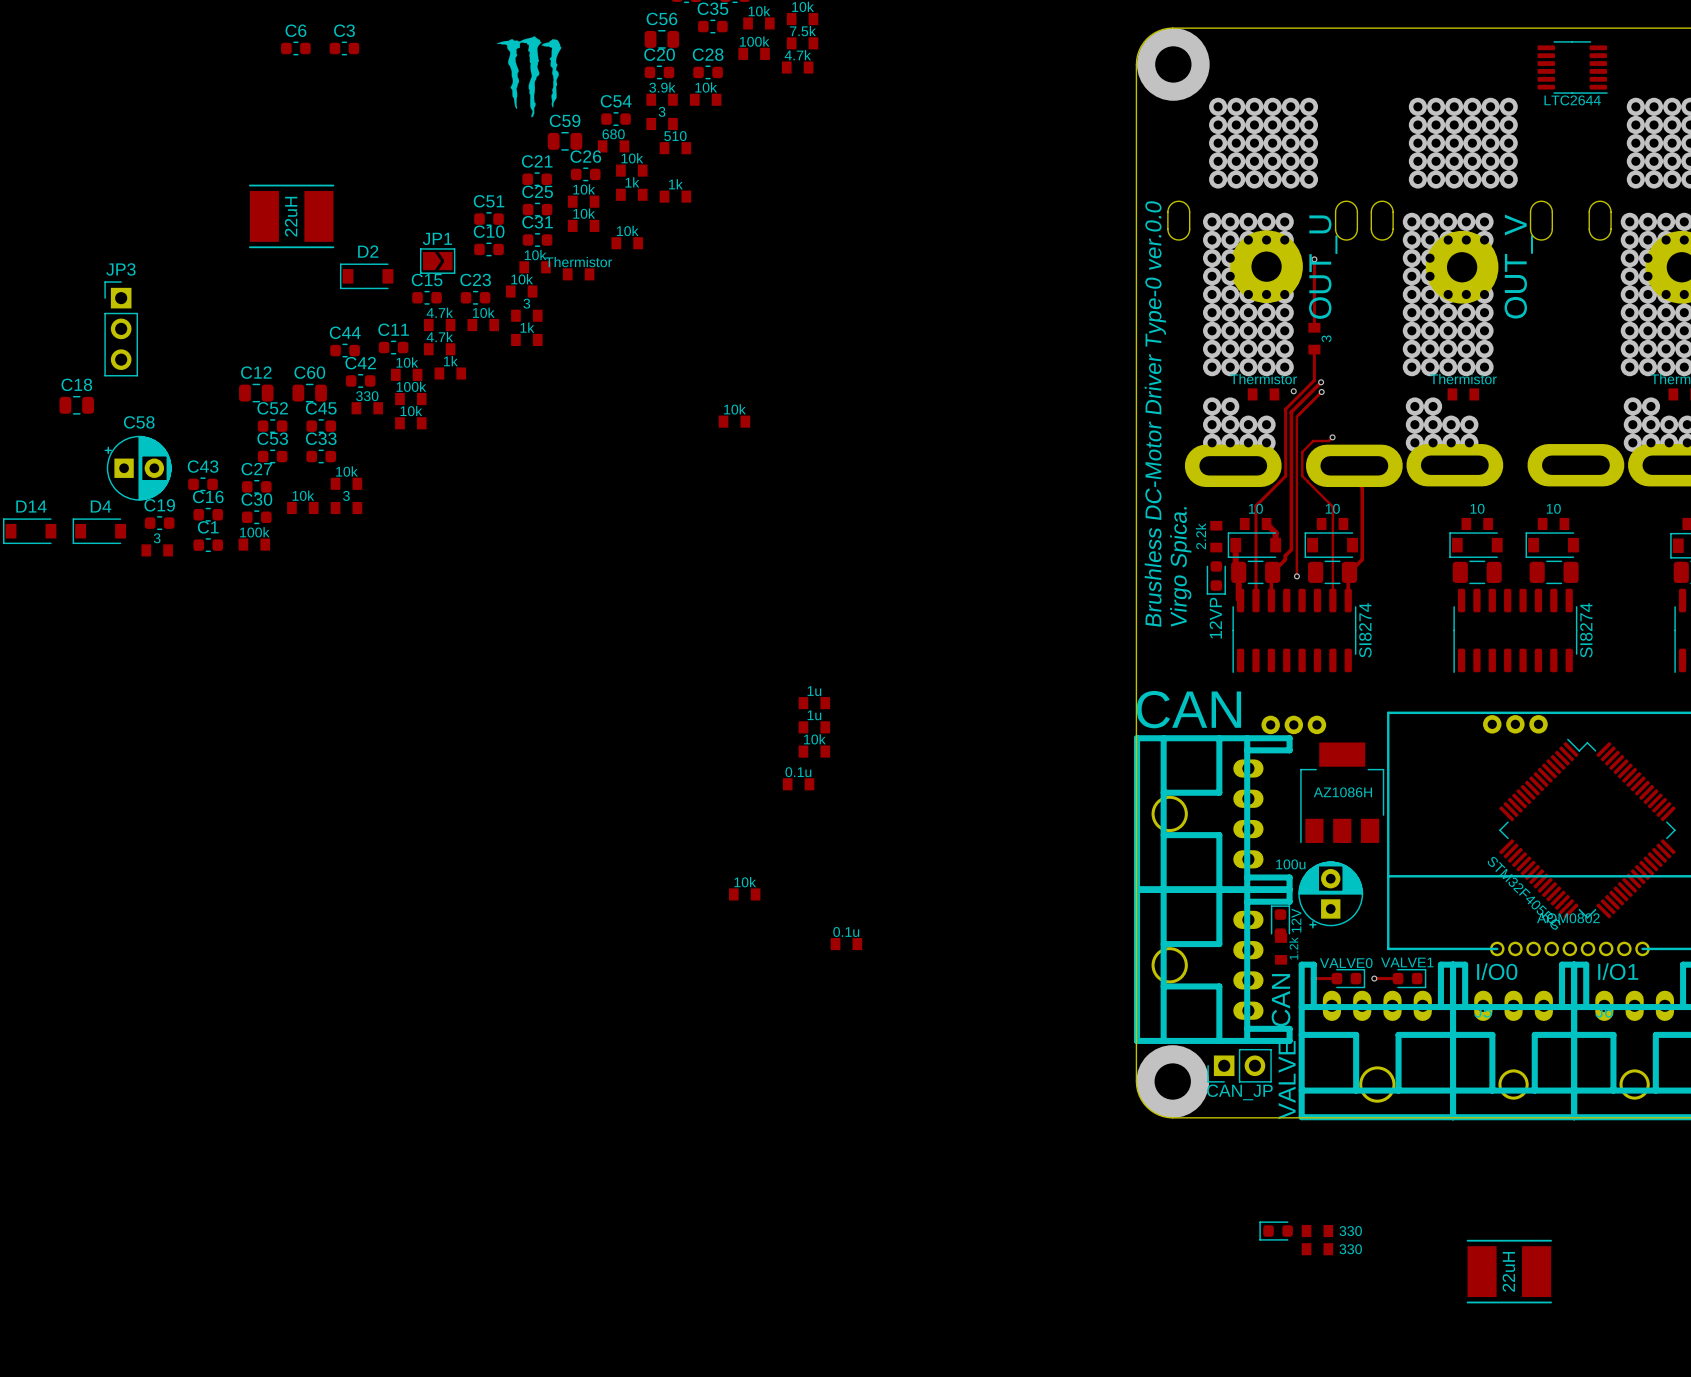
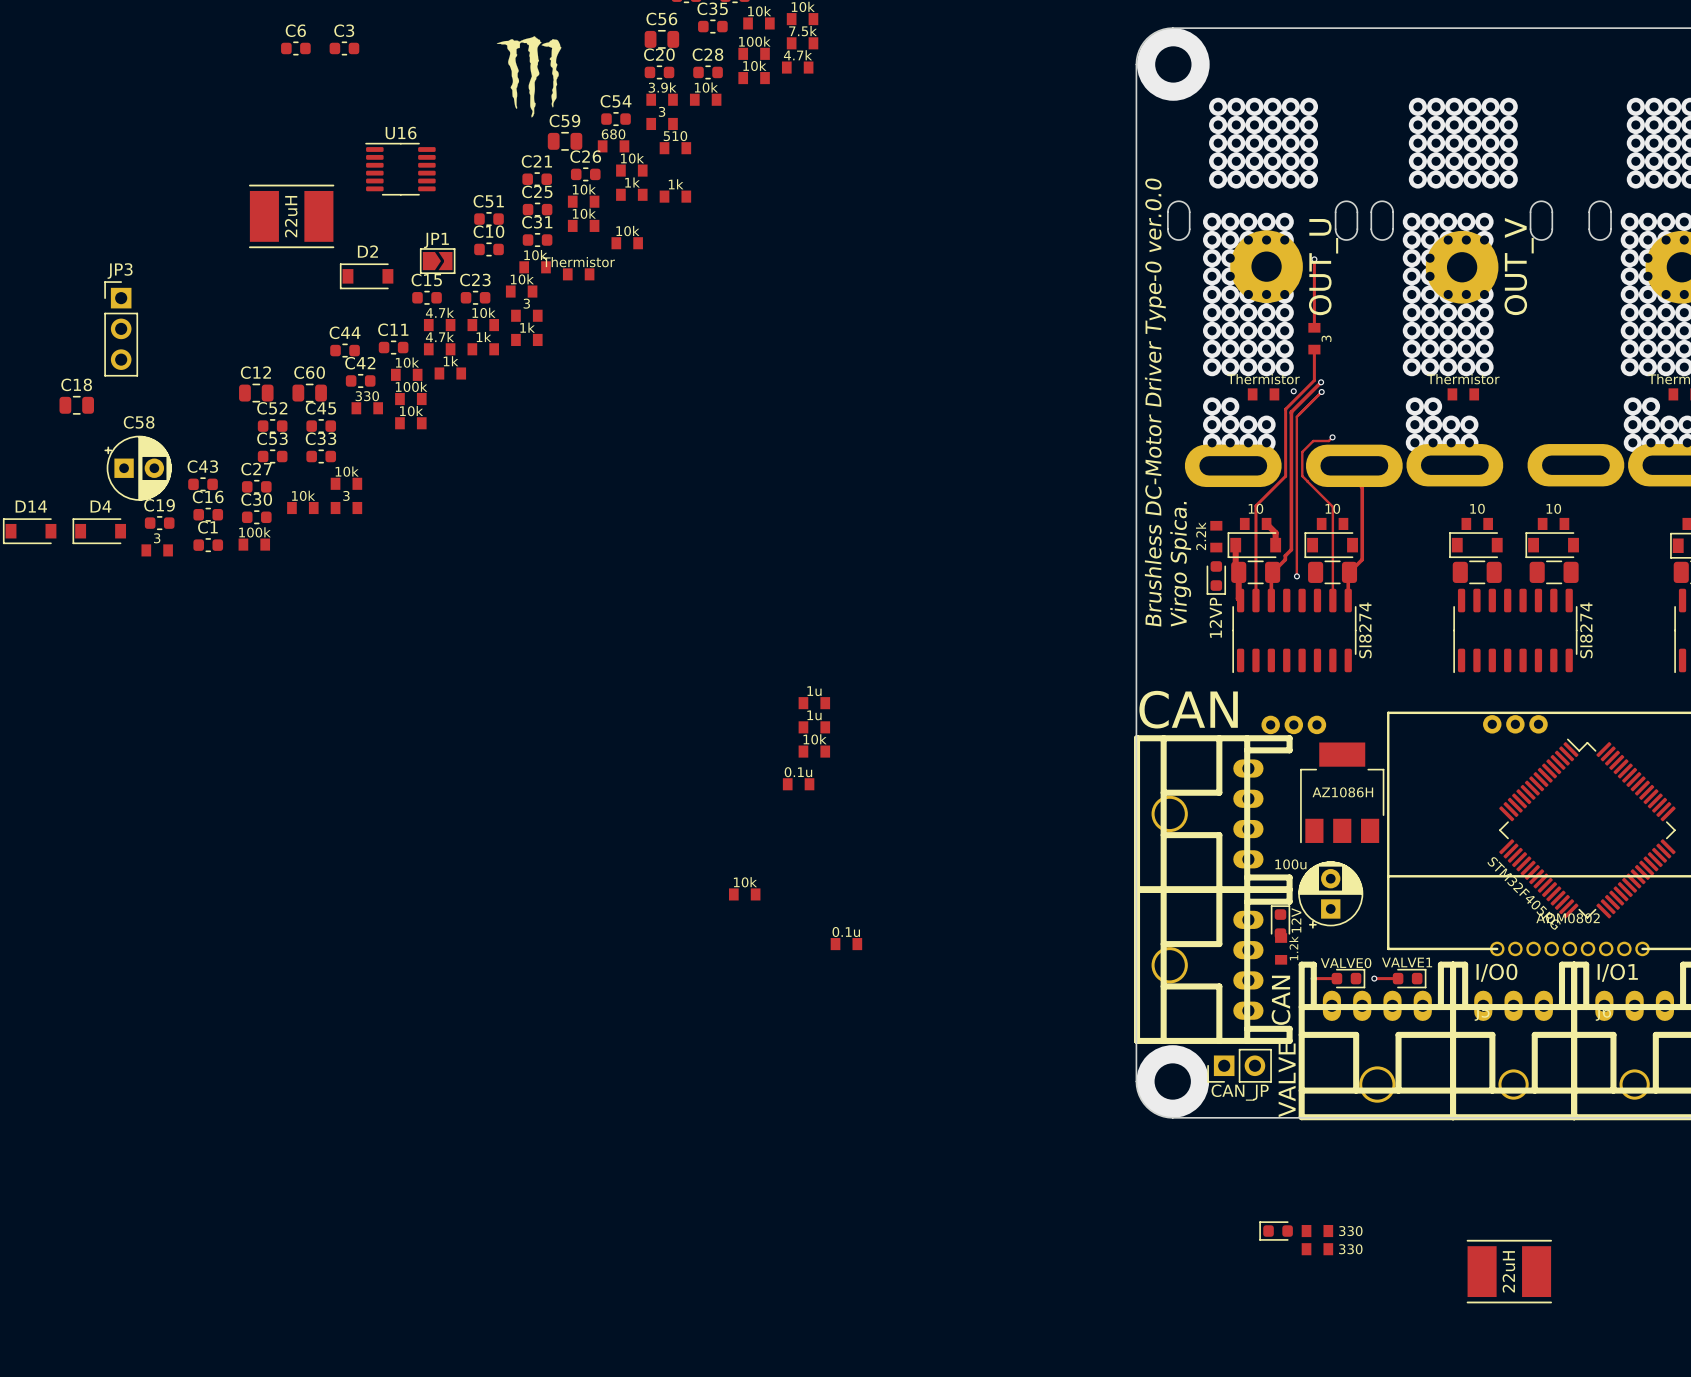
part: LTC2644 (1572, 67) -> none
part: none -> 10k (754, 78)
U16: none -> (400, 169)
part: none -> 1k (483, 349)
part: 10k (734, 421) -> none

